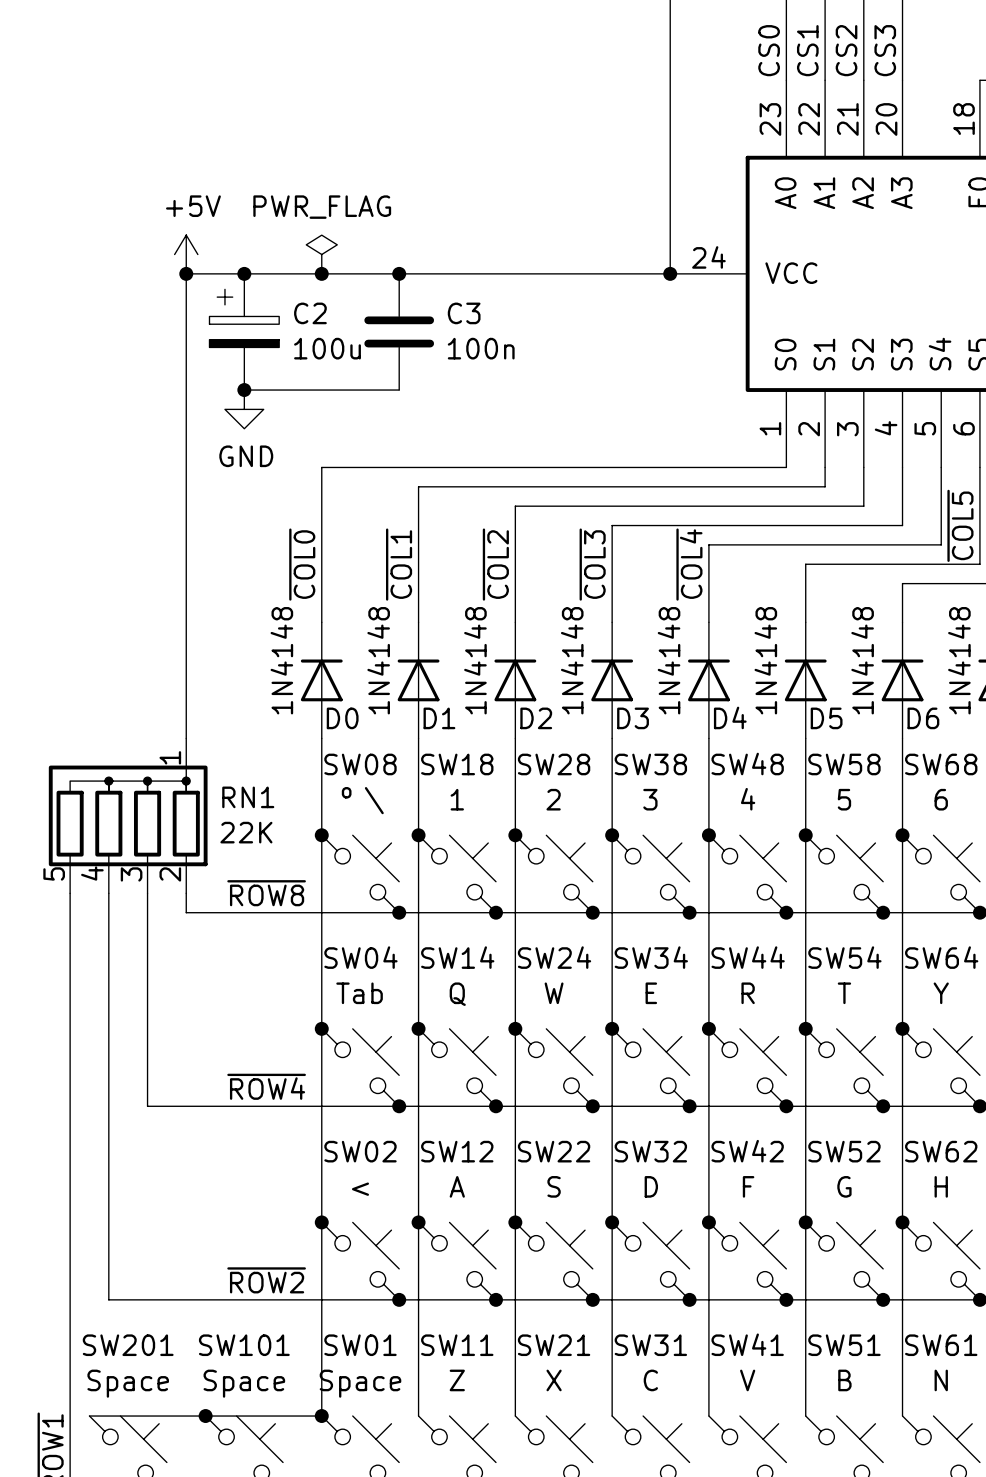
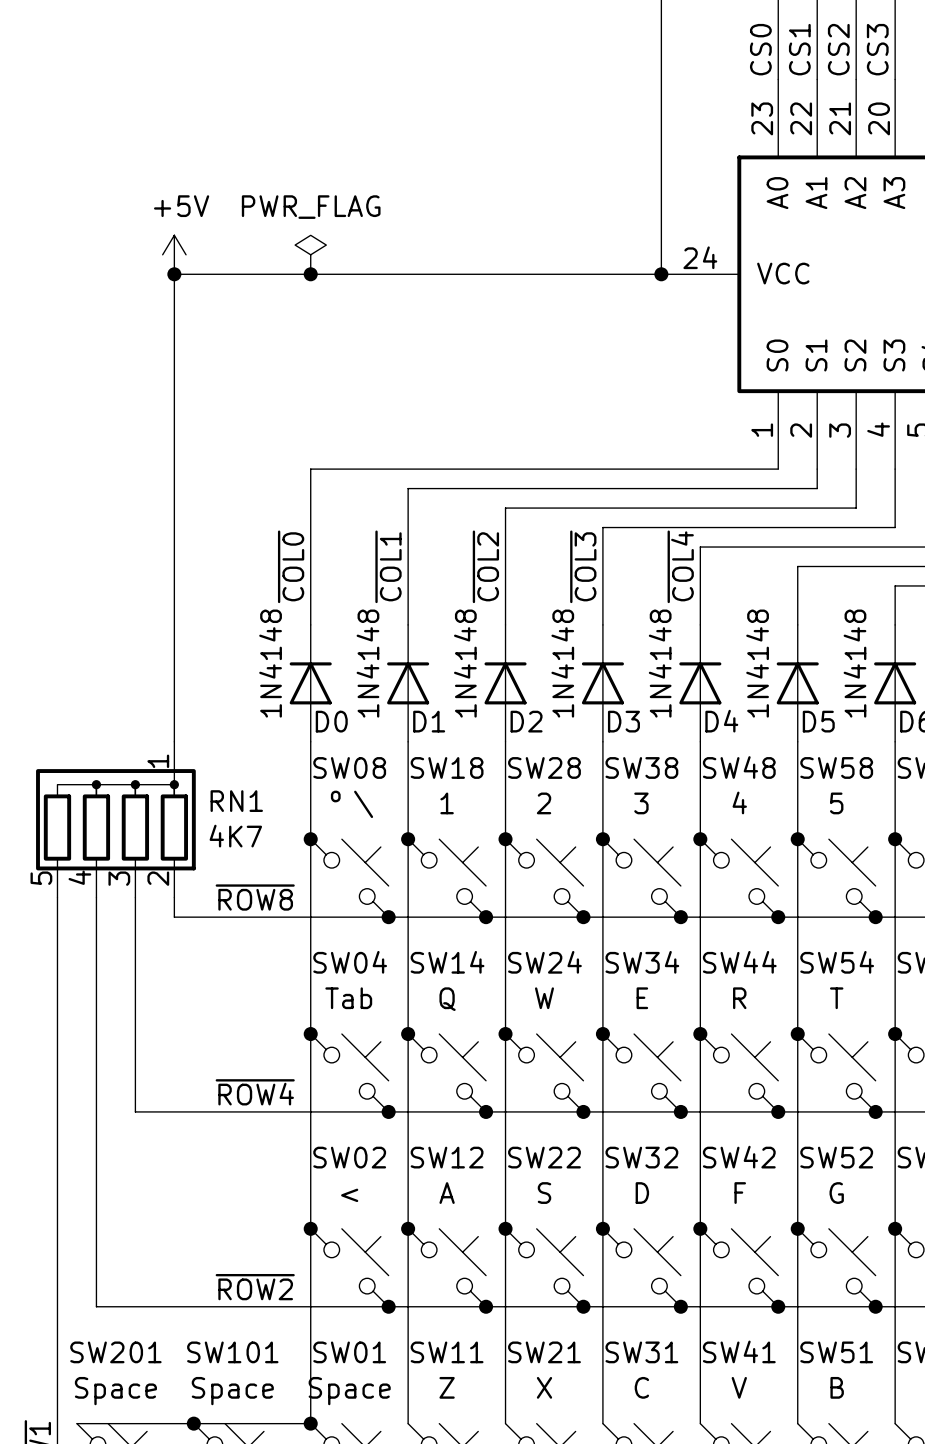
junction: (244, 273) -> none
junction: (399, 273) -> none
C2: 100u (244, 331) -> none
C3: 100n (399, 331) -> none
wire: (244, 390) (399, 390) -> none
junction: (244, 390) -> none
power symbol: GND (244, 409) -> none
RN1 value: 22K (246, 832) -> 4K7 (235, 836)

